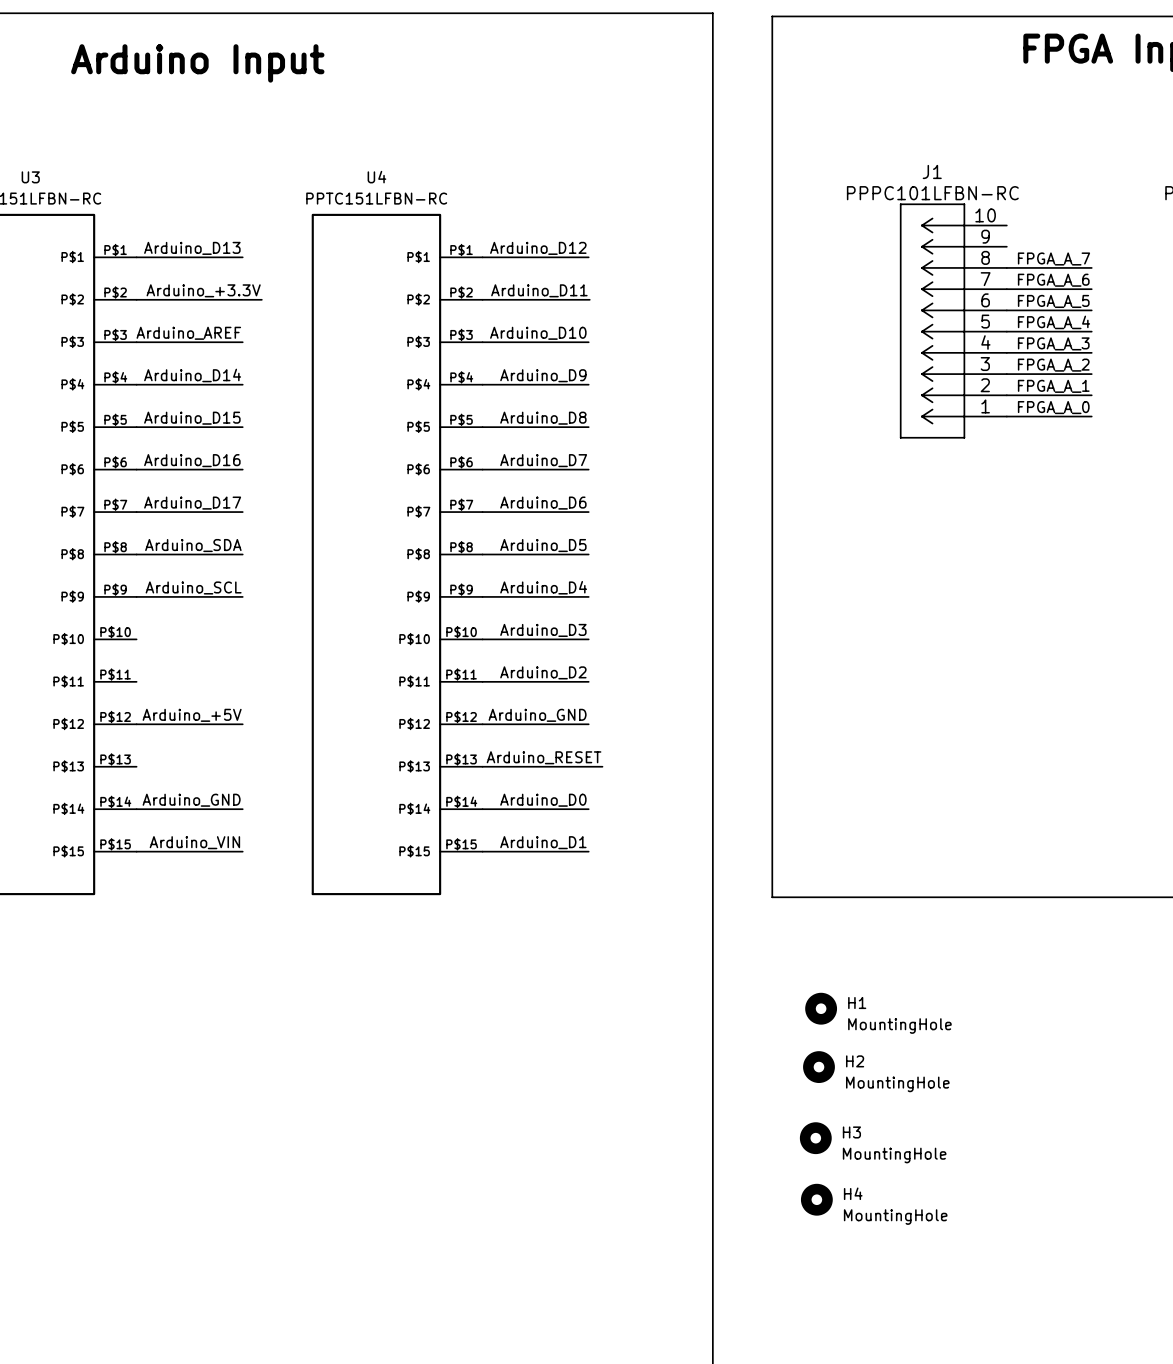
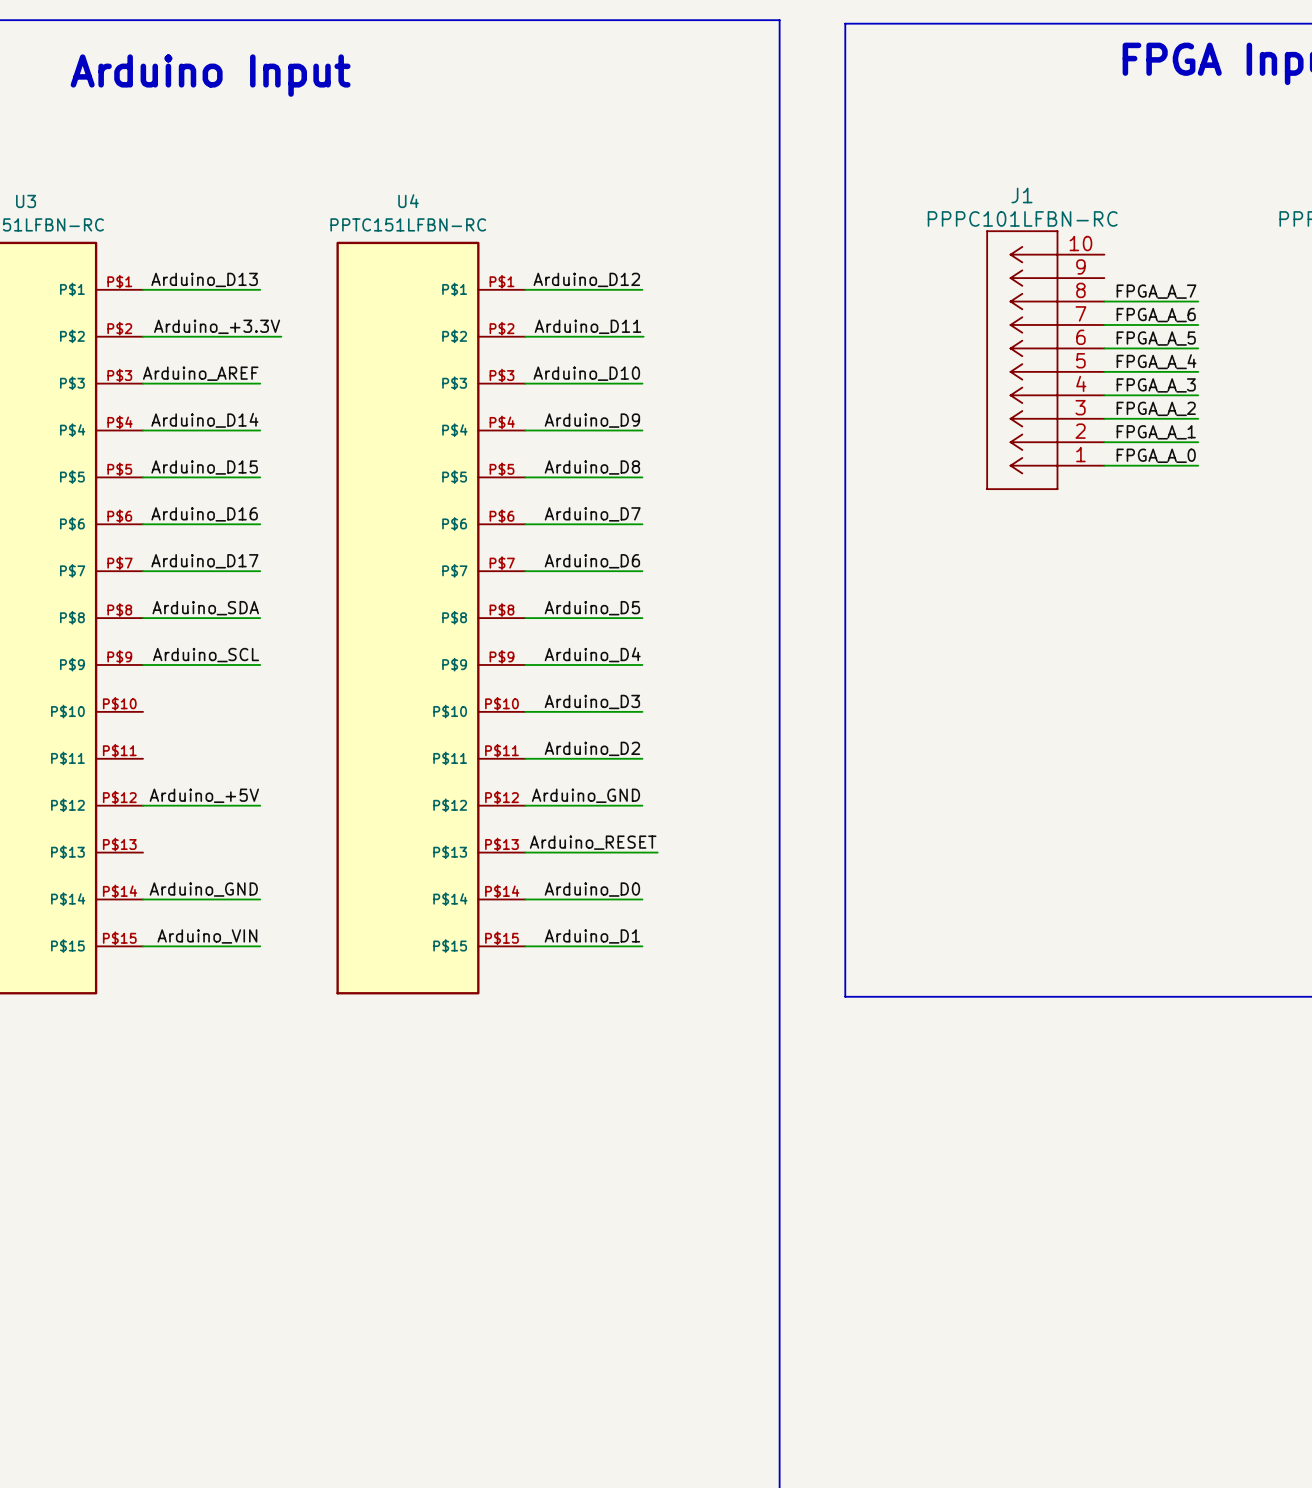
H1: MountingHole (821, 1008) -> none
H2: MountingHole (818, 1067) -> none
H3: MountingHole (815, 1138) -> none
H4: MountingHole (816, 1199) -> none

